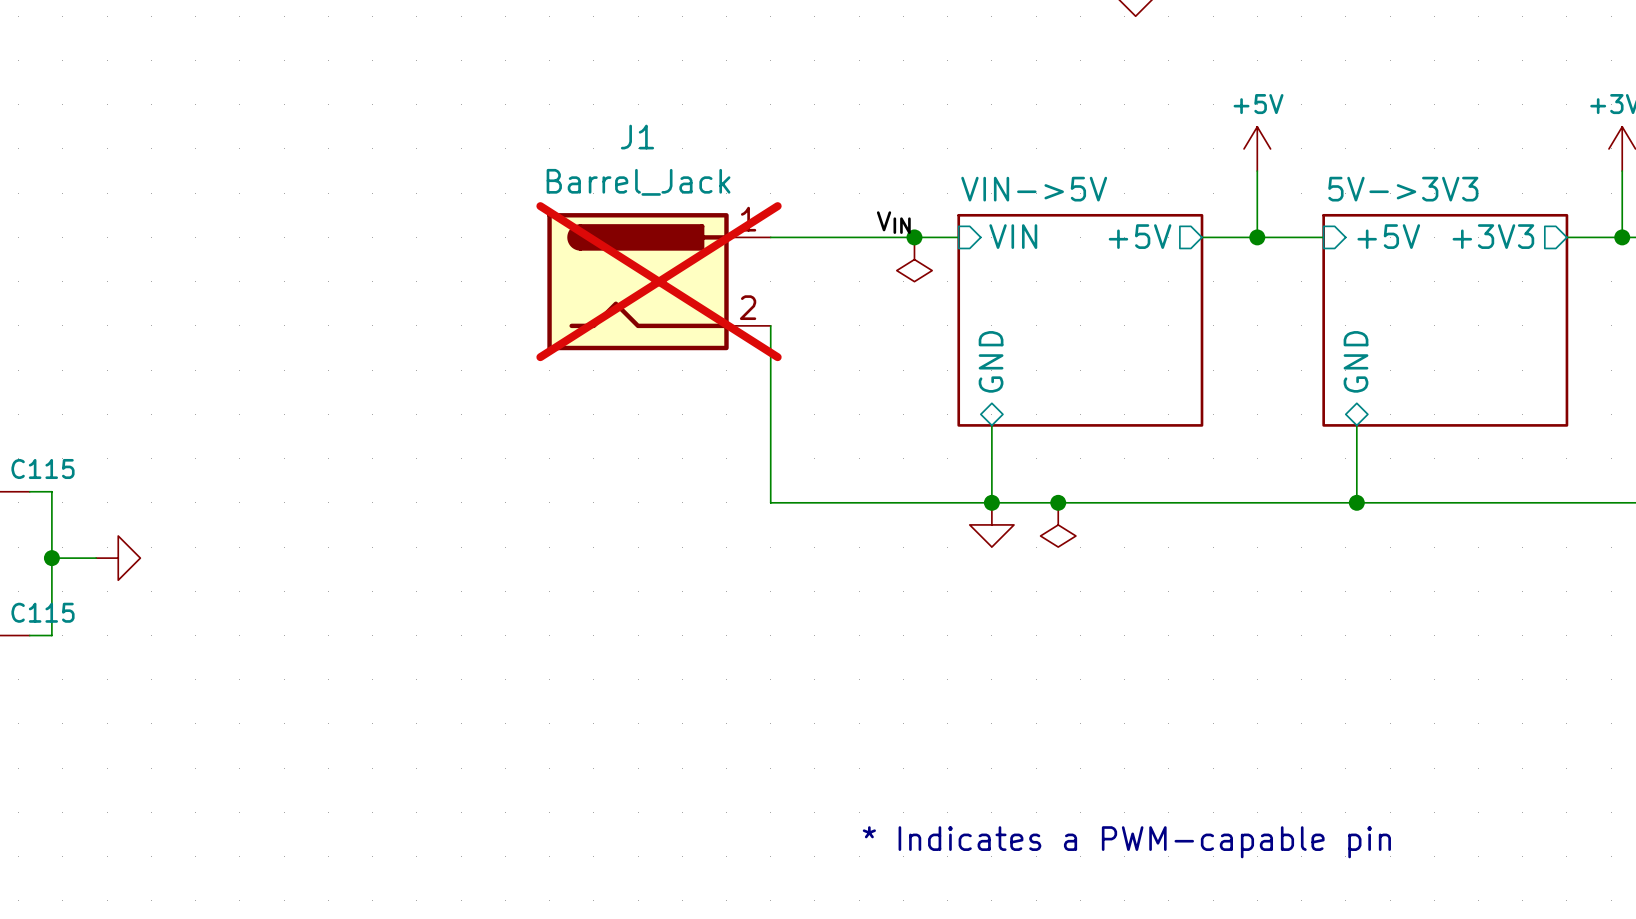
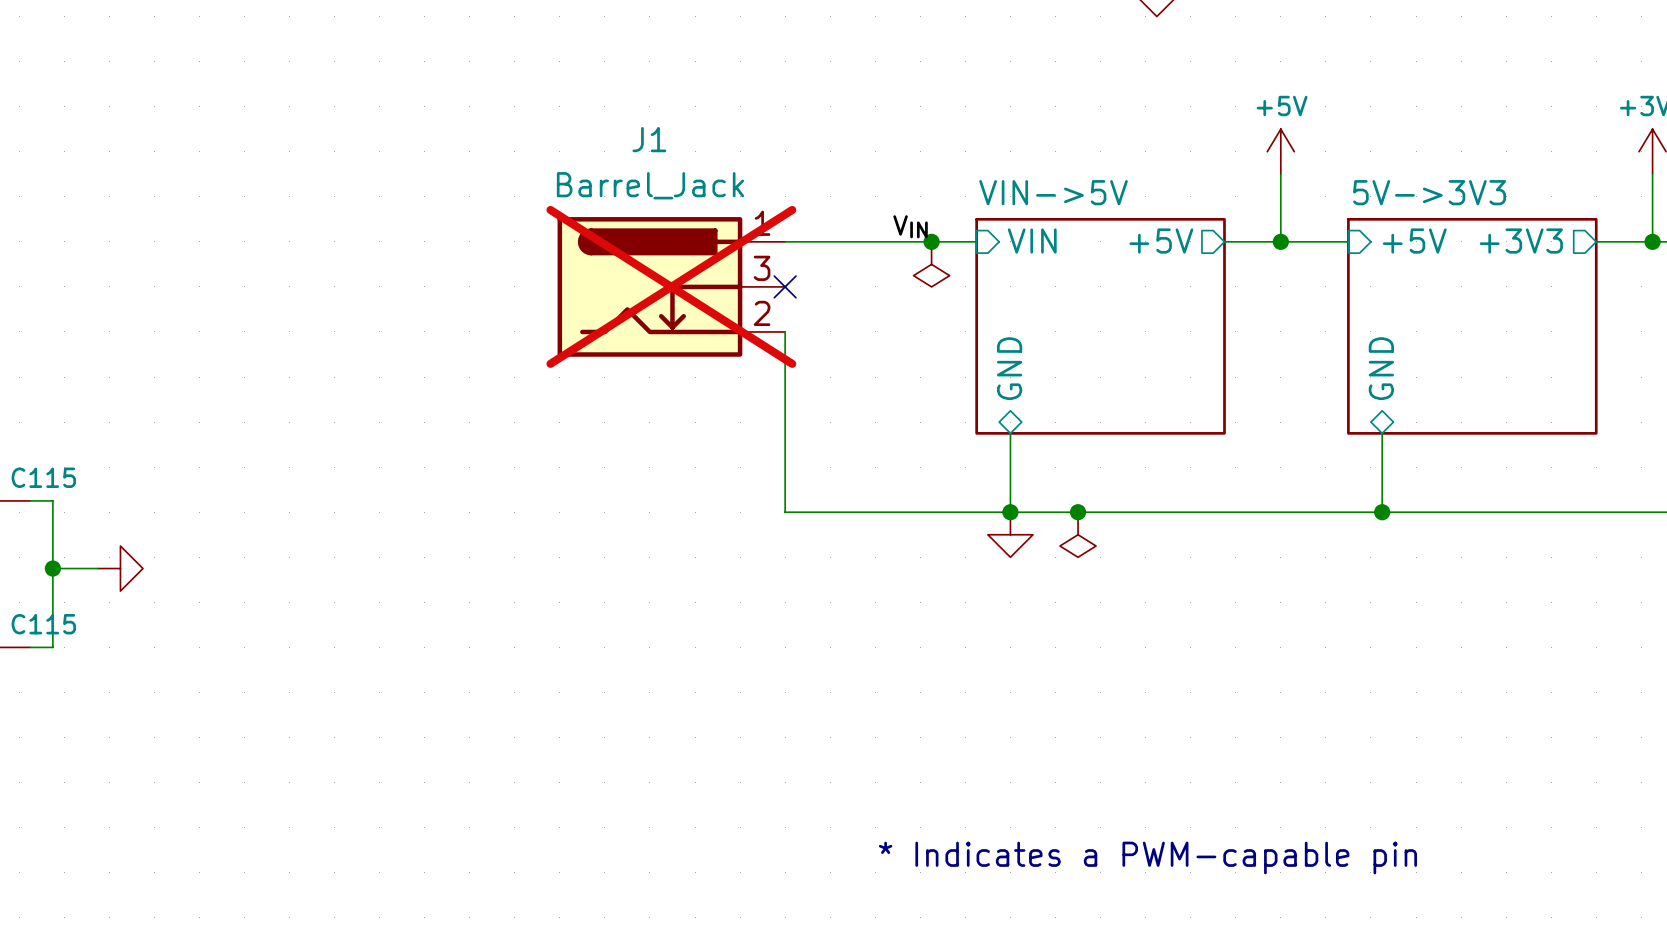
J1 symbol: [547, 213, 771, 351] -> [557, 217, 786, 357]
no-connect mark: none -> (785, 286)

